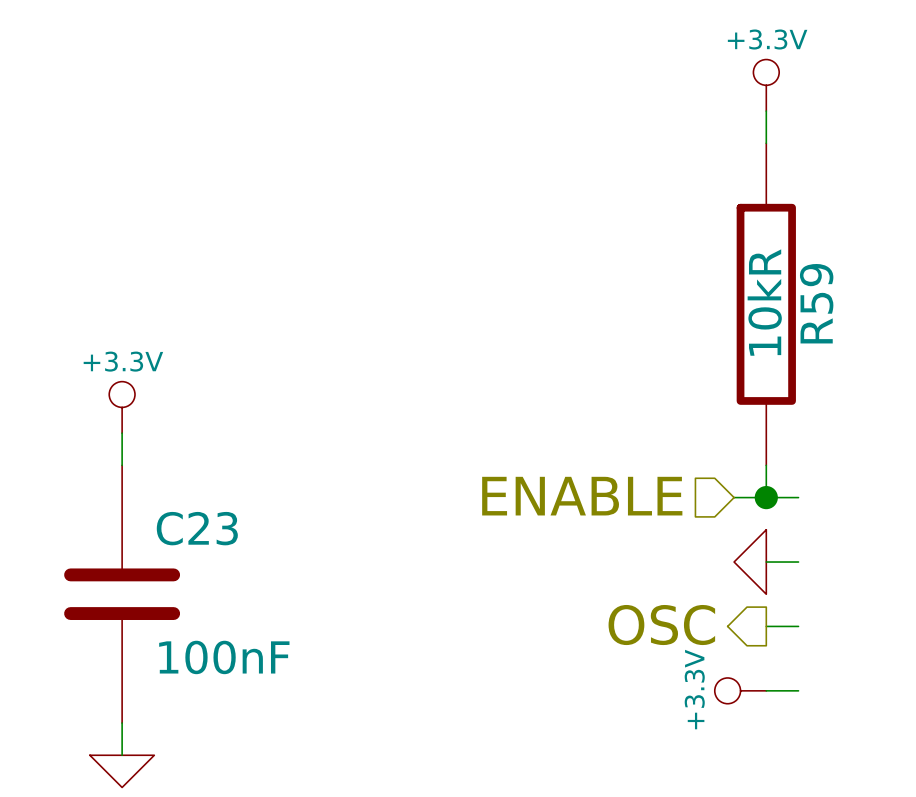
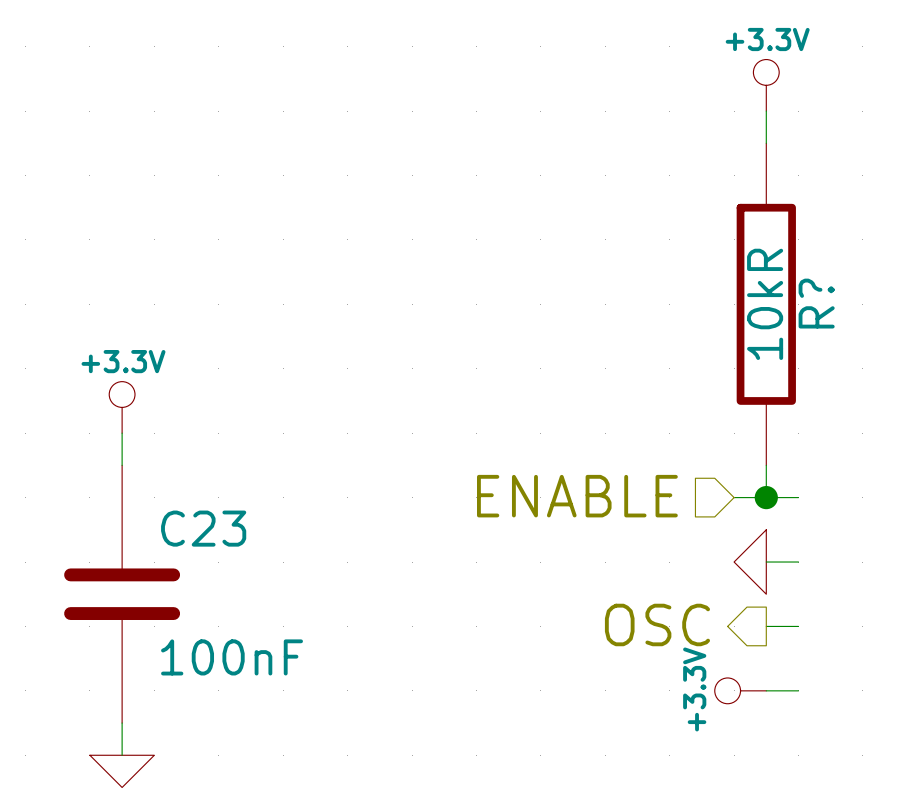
R59 name: R59 (816, 303) -> R? (816, 303)

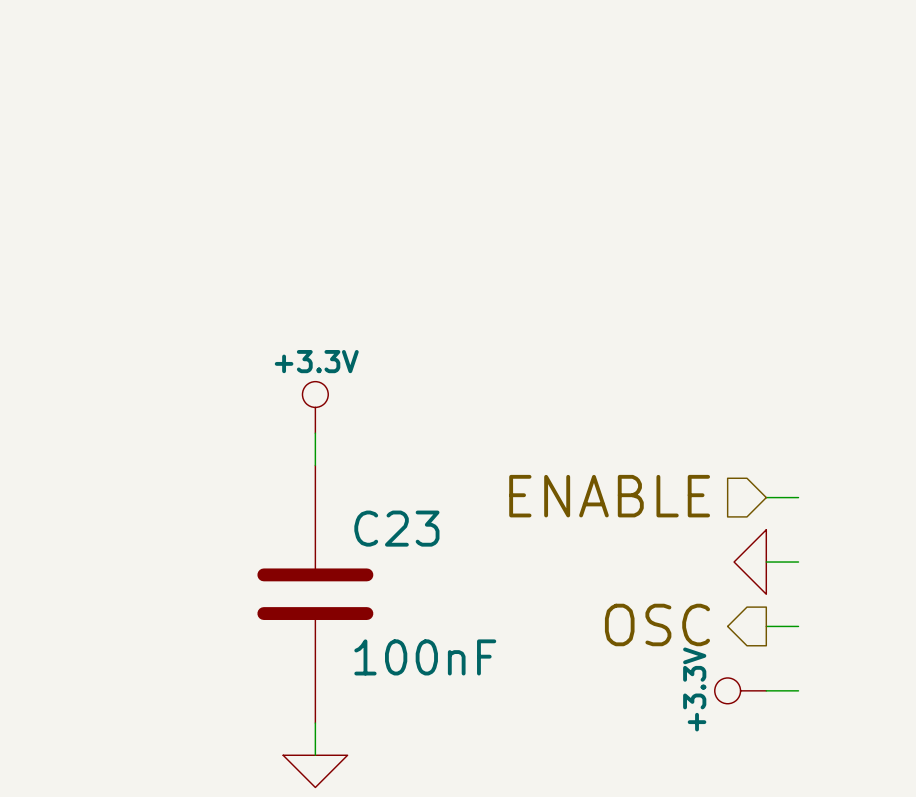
power symbol: +3.3V (766, 85) -> none
wire: (766, 111) (766, 143) -> none
R?: 10kR (766, 304) -> none
power symbol position: +3.3V (122, 407) -> +3.3V (315, 407)
wire: (122, 433) (122, 465) -> (315, 433) (315, 465)
wire: (766, 465) (766, 497) (734, 497) -> none
hierarchical label position: ENABLE (577, 496) -> ENABLE (609, 496)
junction: (766, 497) -> none
C23 position: (122, 594) -> (315, 594)
wire: (122, 723) (122, 755) -> (315, 723) (315, 755)
power symbol position: (122, 771) -> (315, 771)

